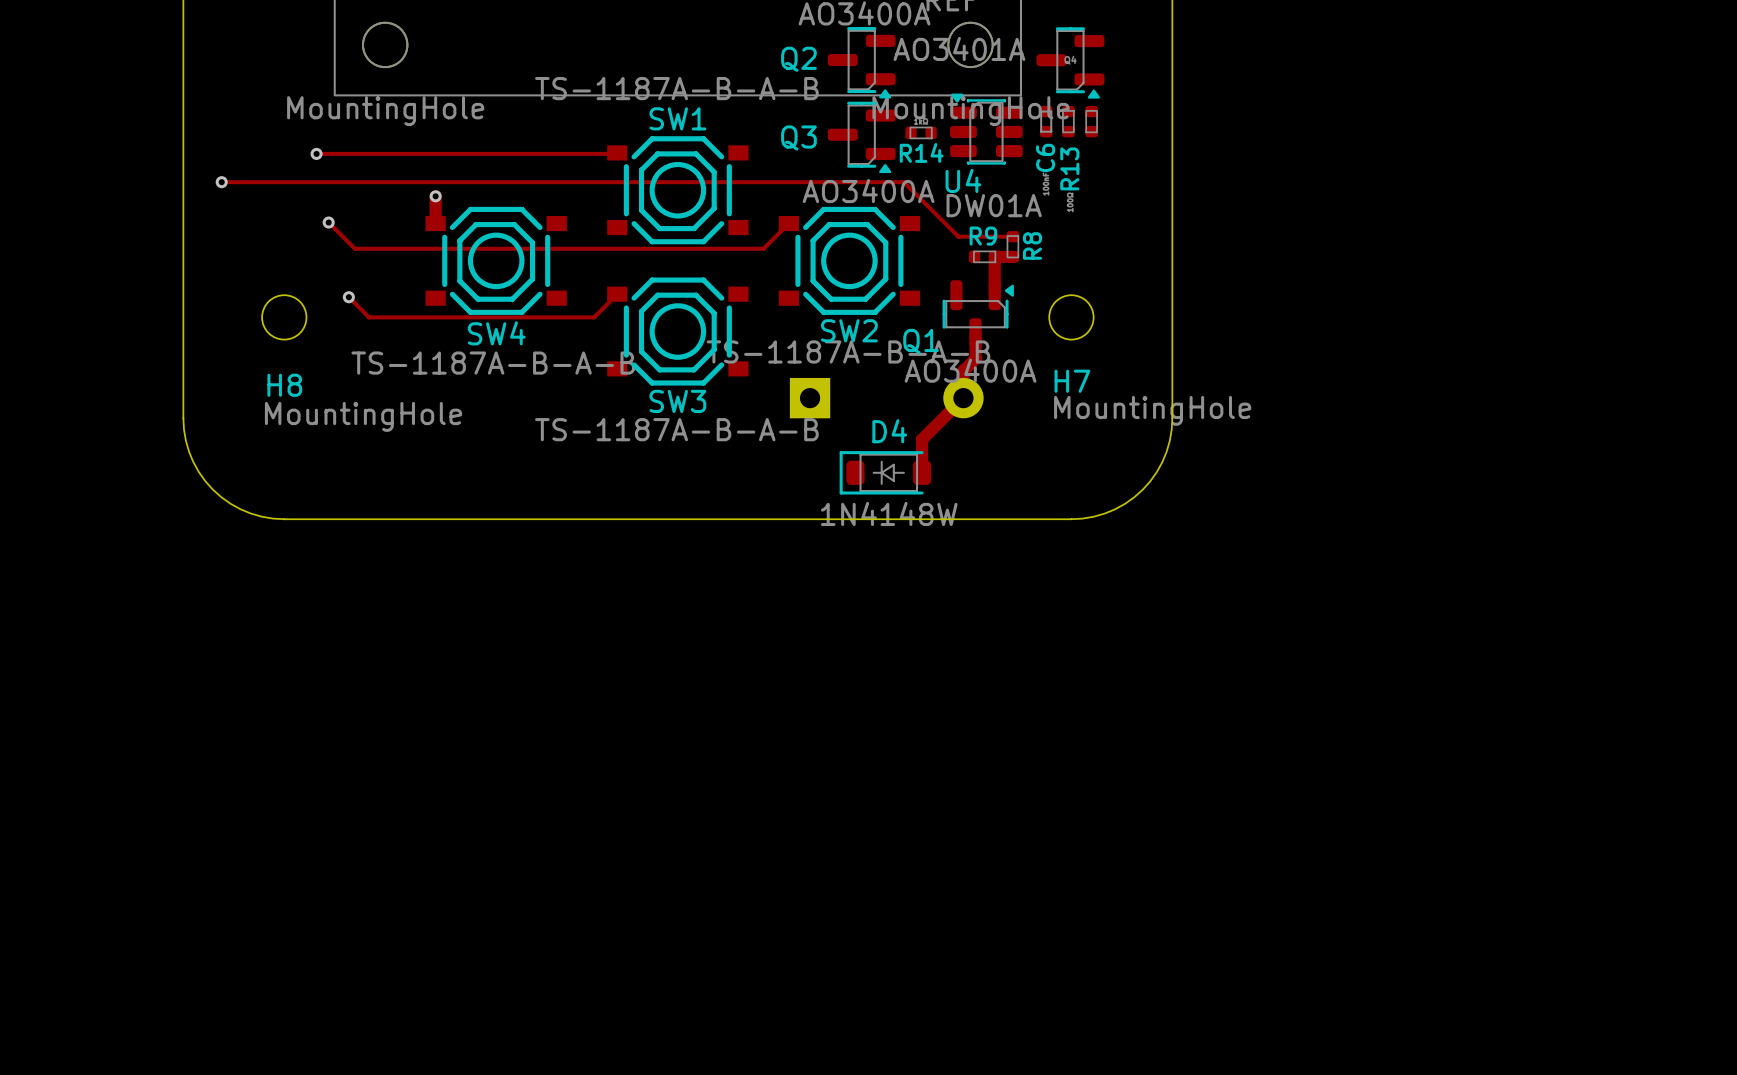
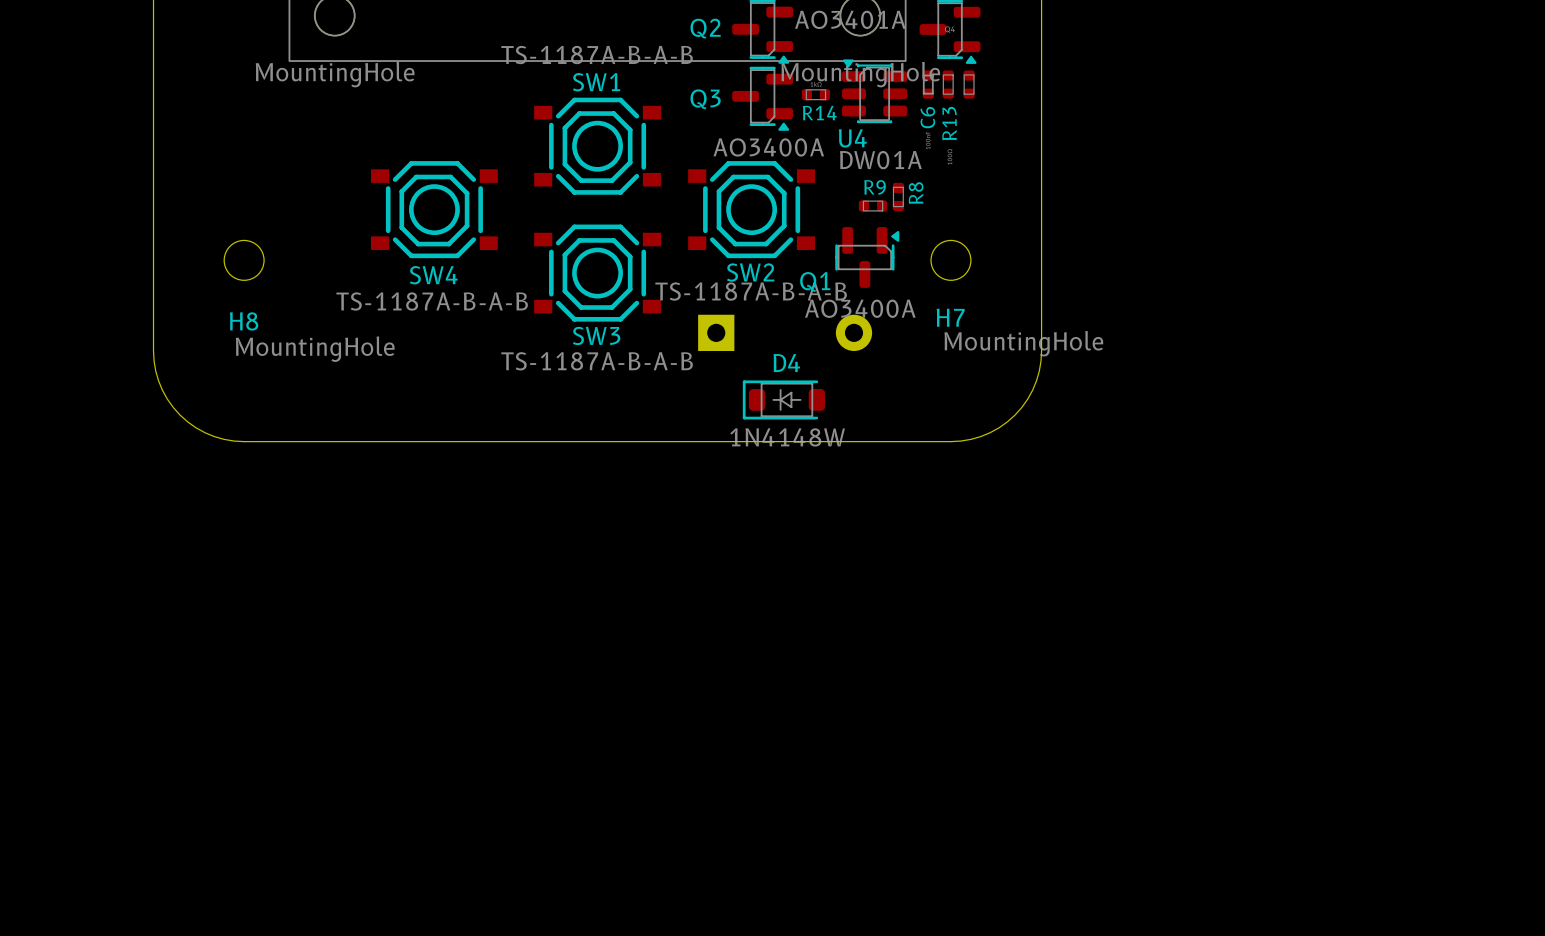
track: (617, 152) (316, 153) -> none
via: (316, 153) -> none
track: (221, 182) (903, 182) (958, 236) (1012, 236) -> none
via: (221, 182) -> none
track: (435, 196) (435, 223) -> none
via: (435, 196) -> none
track: (328, 222) (354, 248) (763, 248) (788, 223) -> none
via: (328, 222) -> none
track: (1012, 256) (994, 256) (994, 295) -> none
track: (617, 294) (594, 317) (369, 317) (348, 297) -> none
via: (348, 297) -> none
track: (975, 333) (975, 358) (963, 370) (963, 398) (922, 439) (922, 472) -> none

